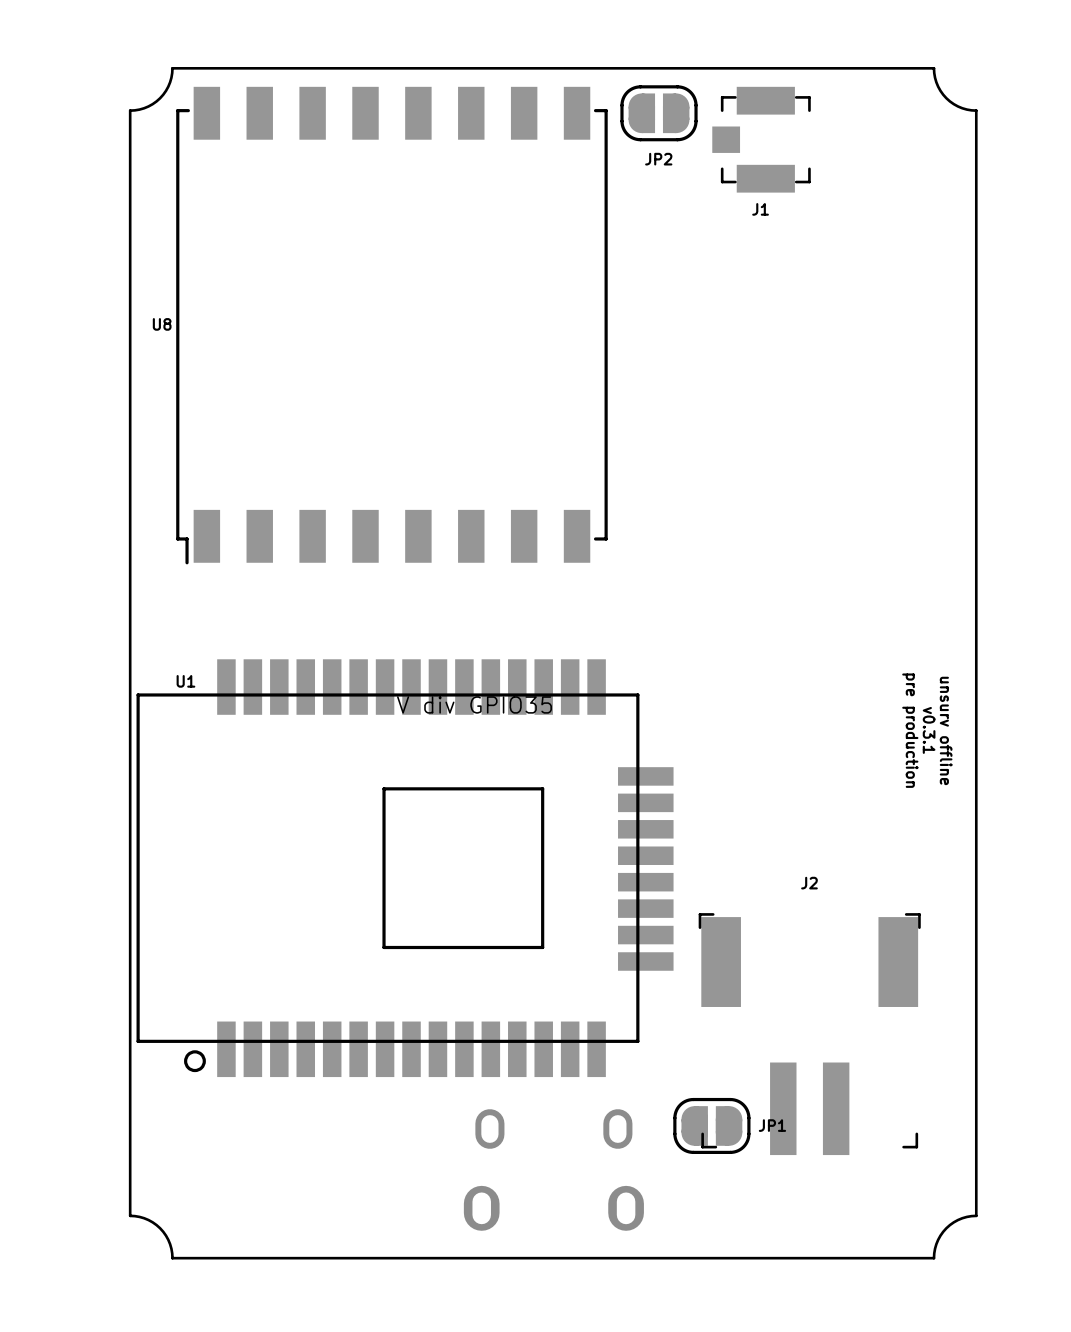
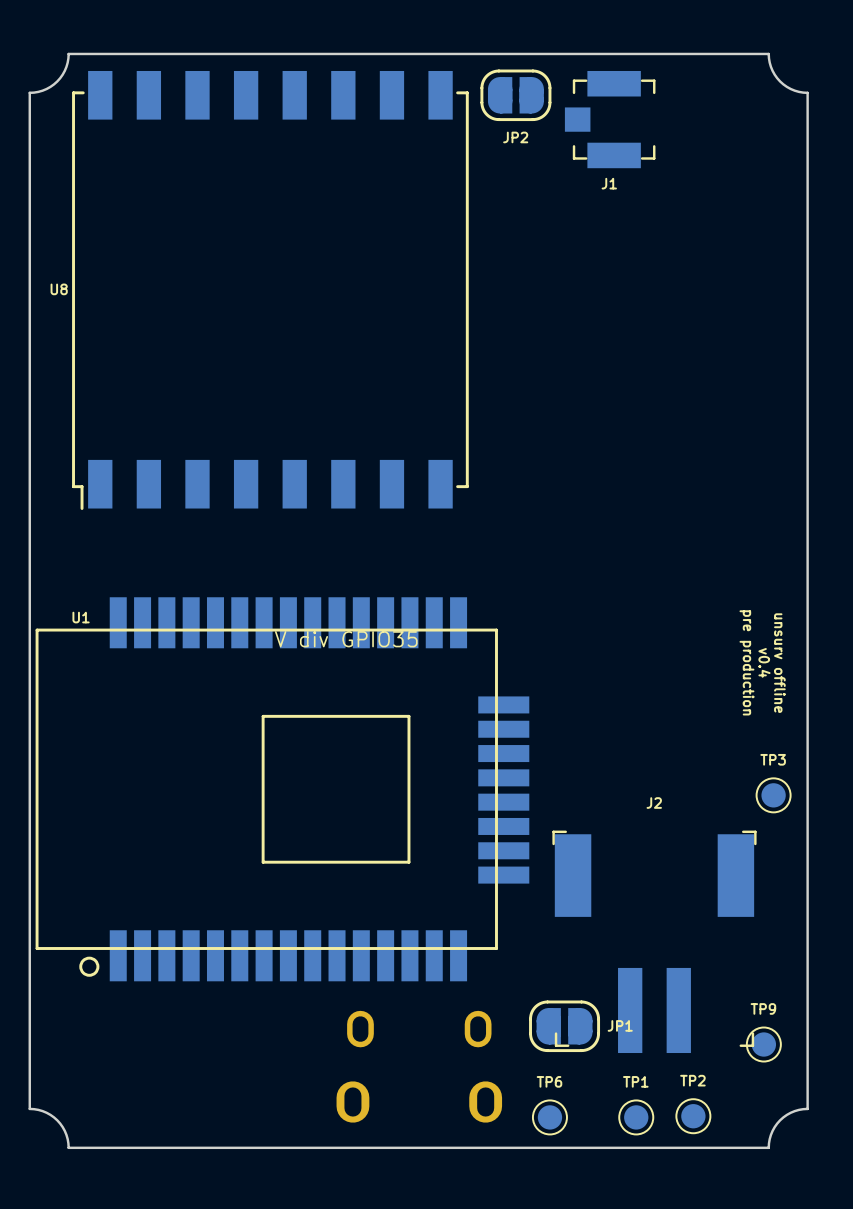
text: v0.3.1 (929, 730) -> v0.4 (764, 662)
TP3: none -> (773, 795)
TP9: none -> (763, 1044)
TP2: none -> (693, 1116)
TP6: none -> (549, 1117)
TP1: none -> (636, 1117)

